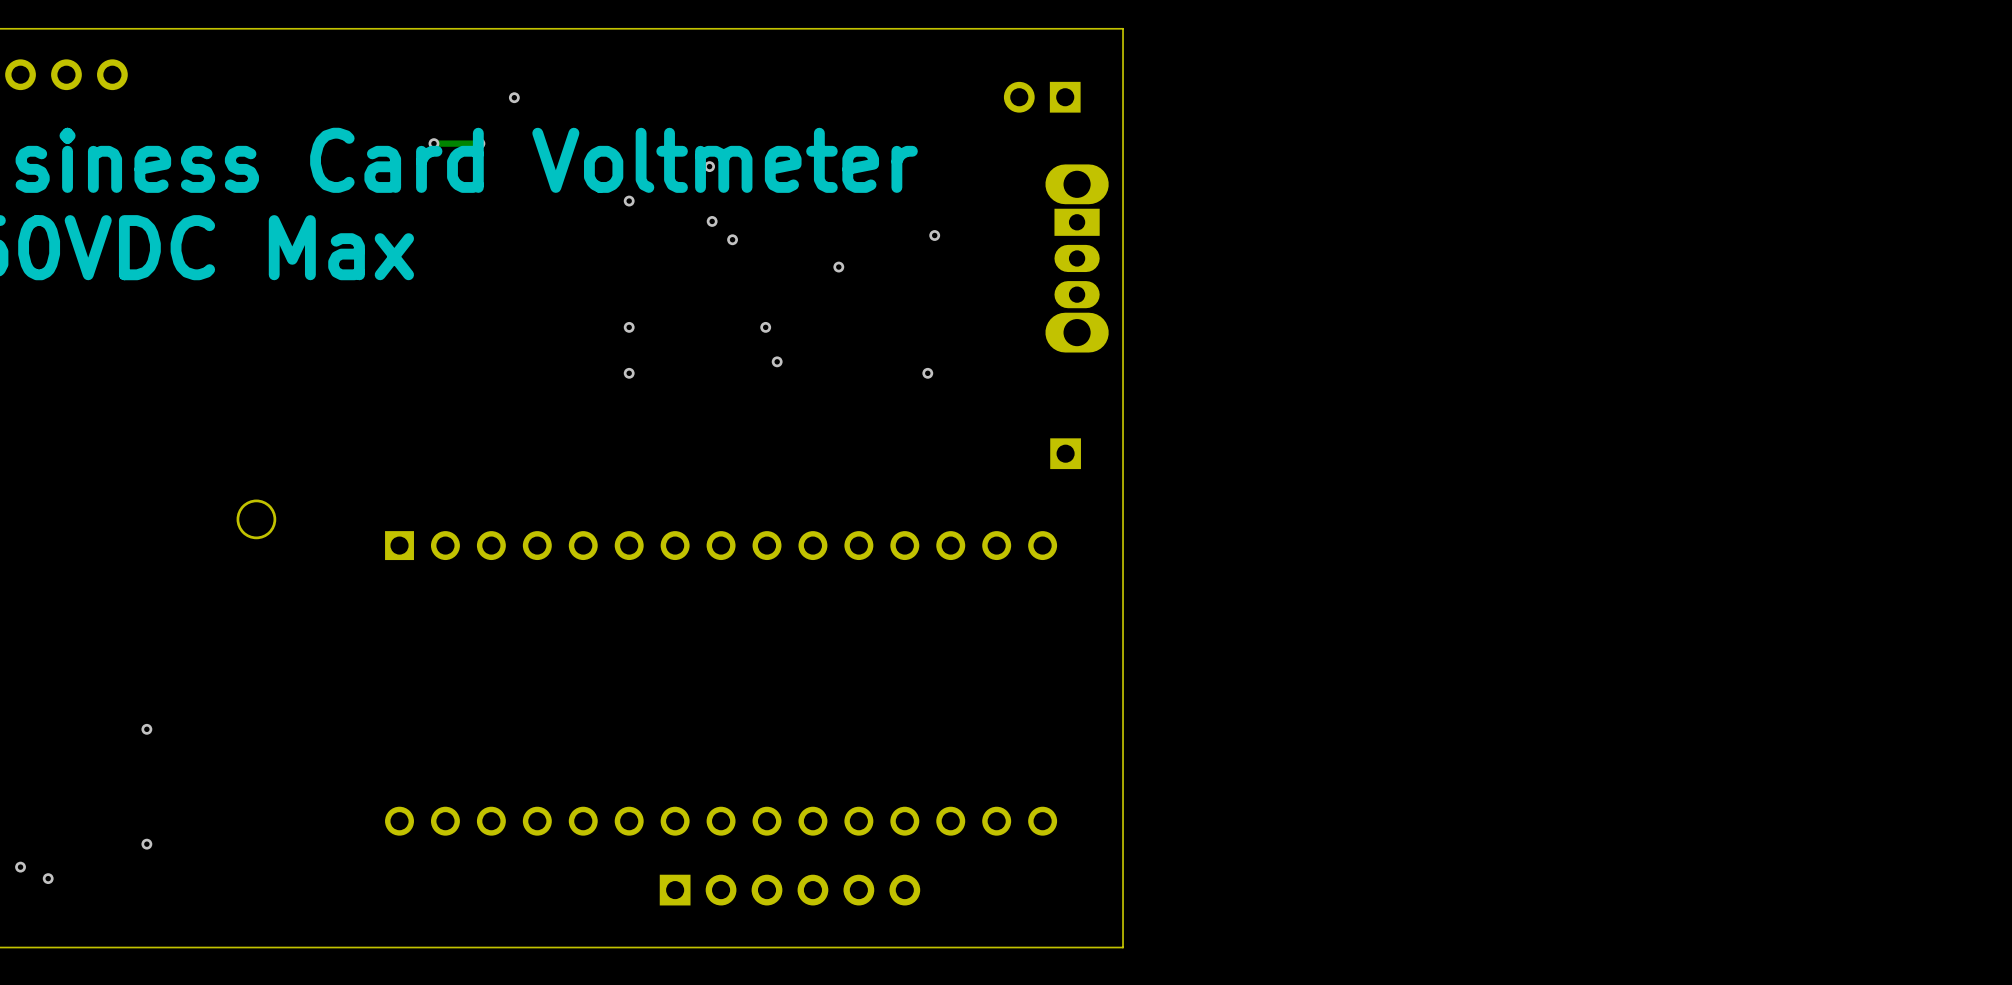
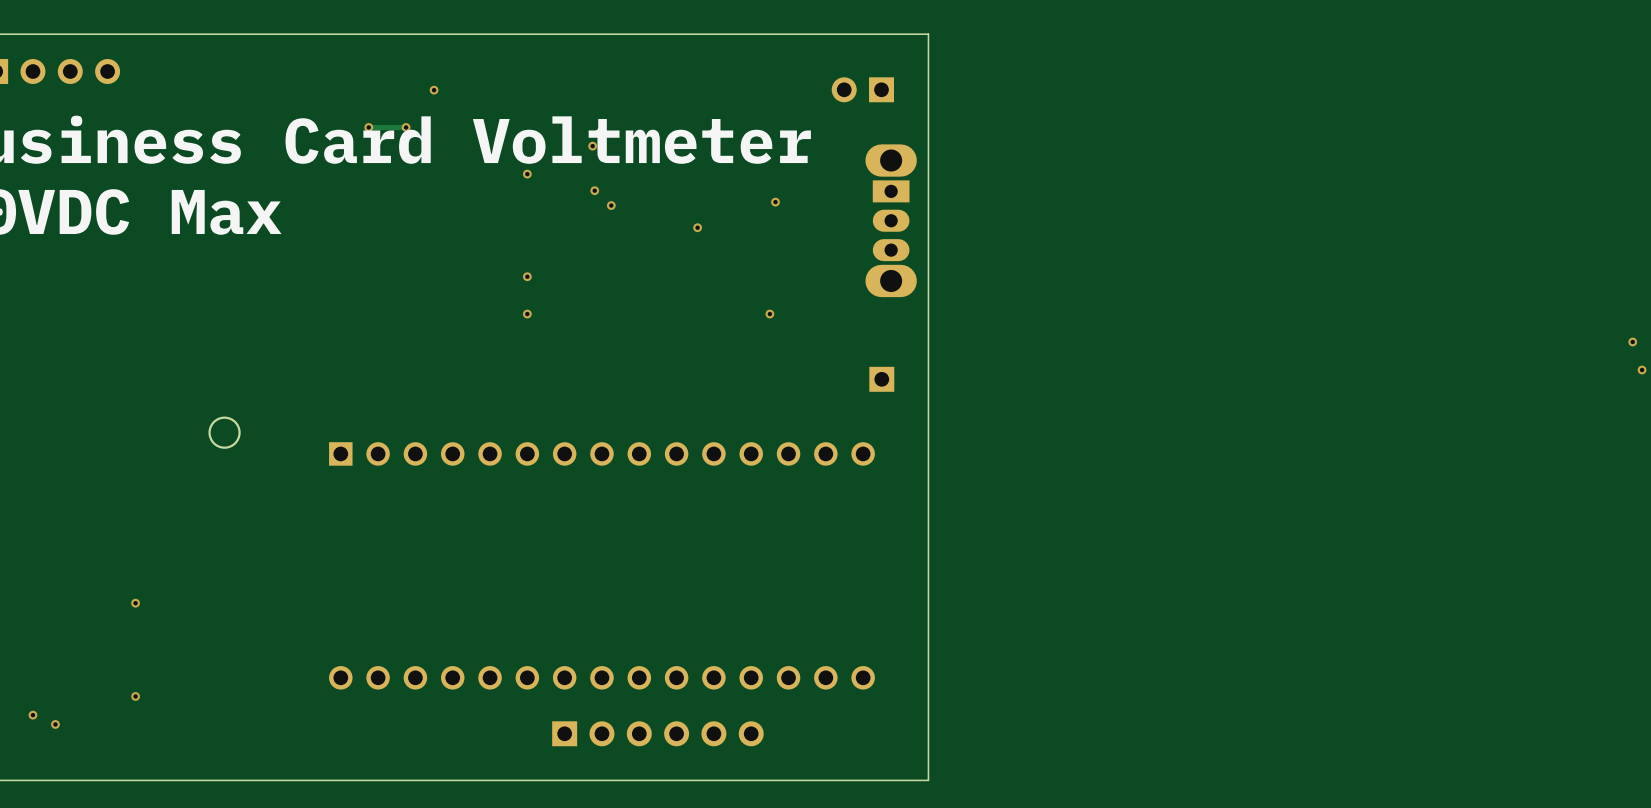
via: (765, 327) -> none
via: (777, 361) -> none
via: none -> (1632, 342)
via: none -> (1642, 369)

